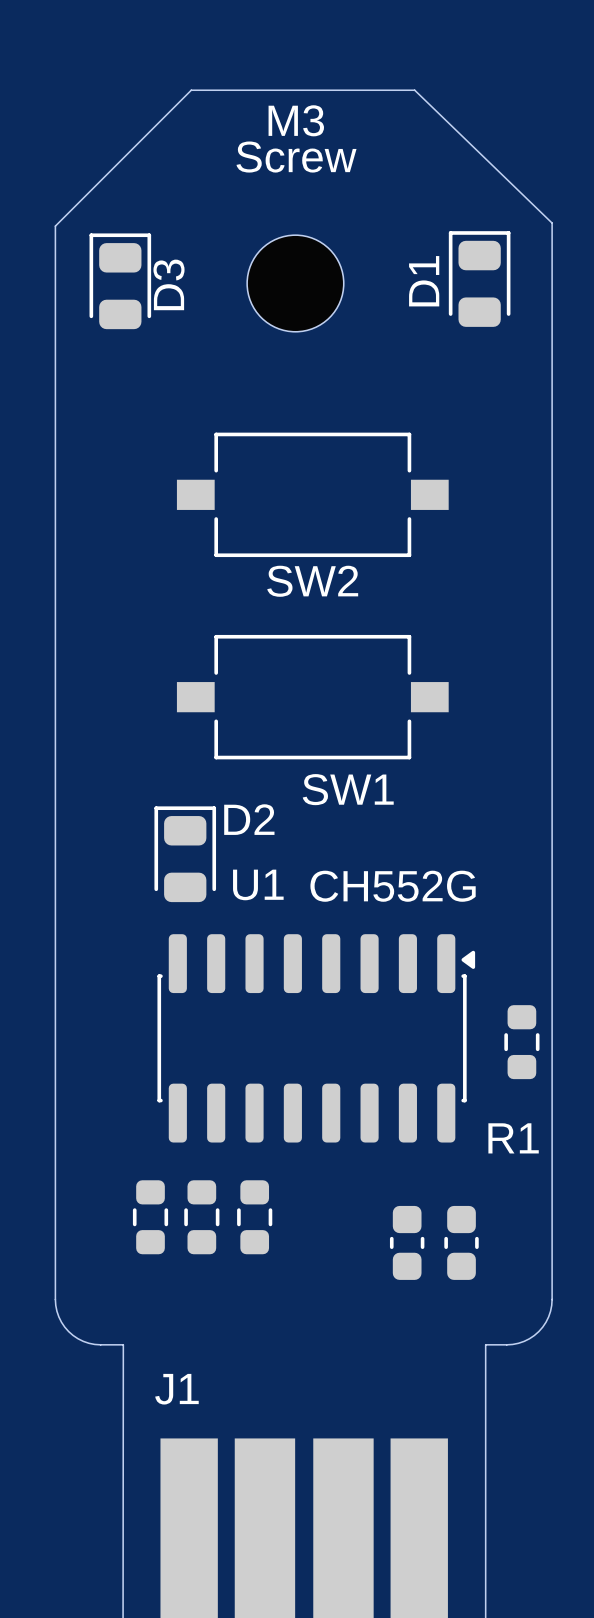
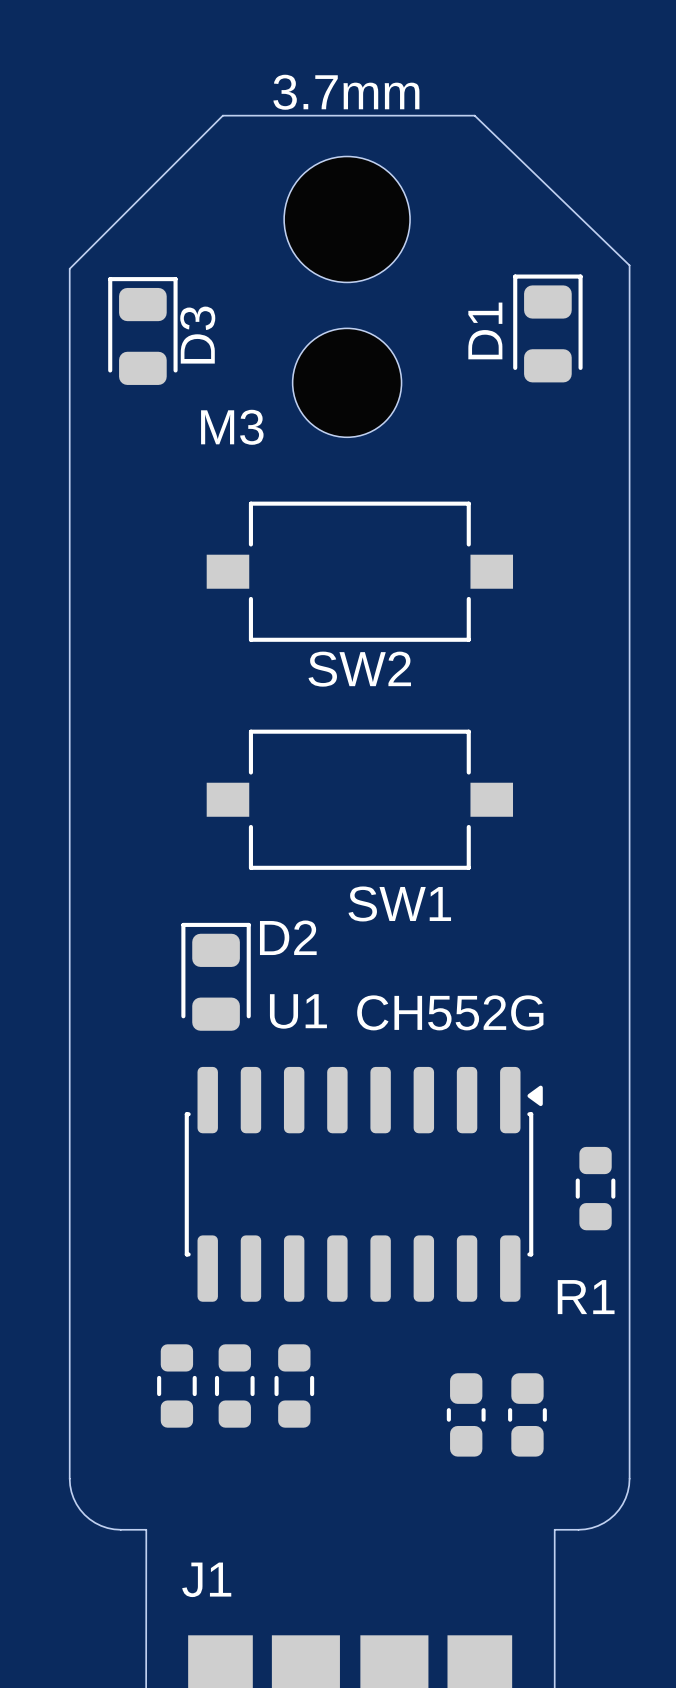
3.7mm: none -> (347, 219)
Screw: M3 (295, 283) -> none
M3: none -> (347, 382)

